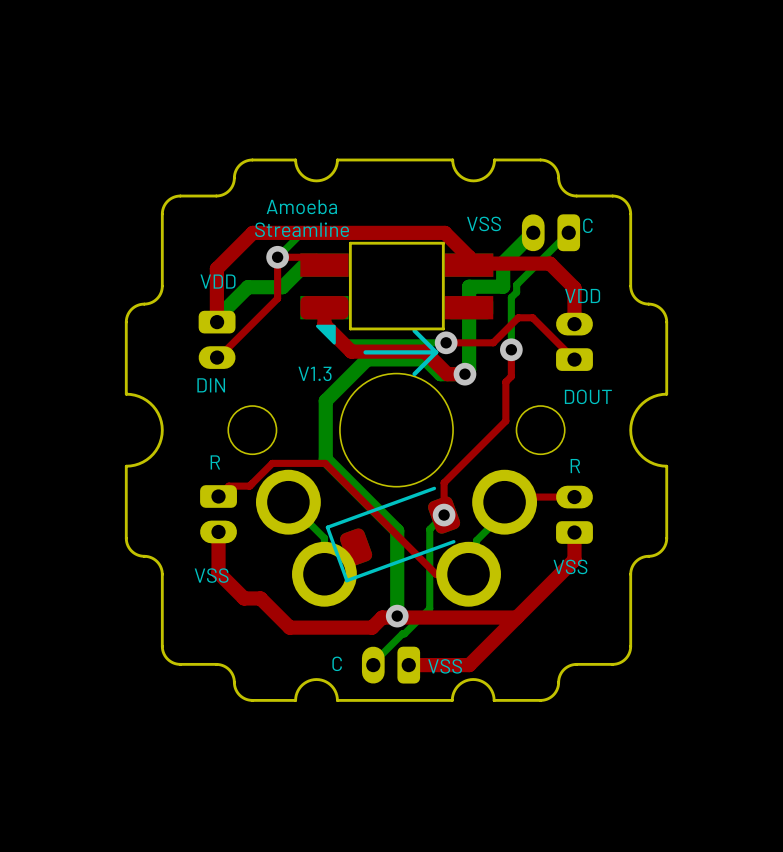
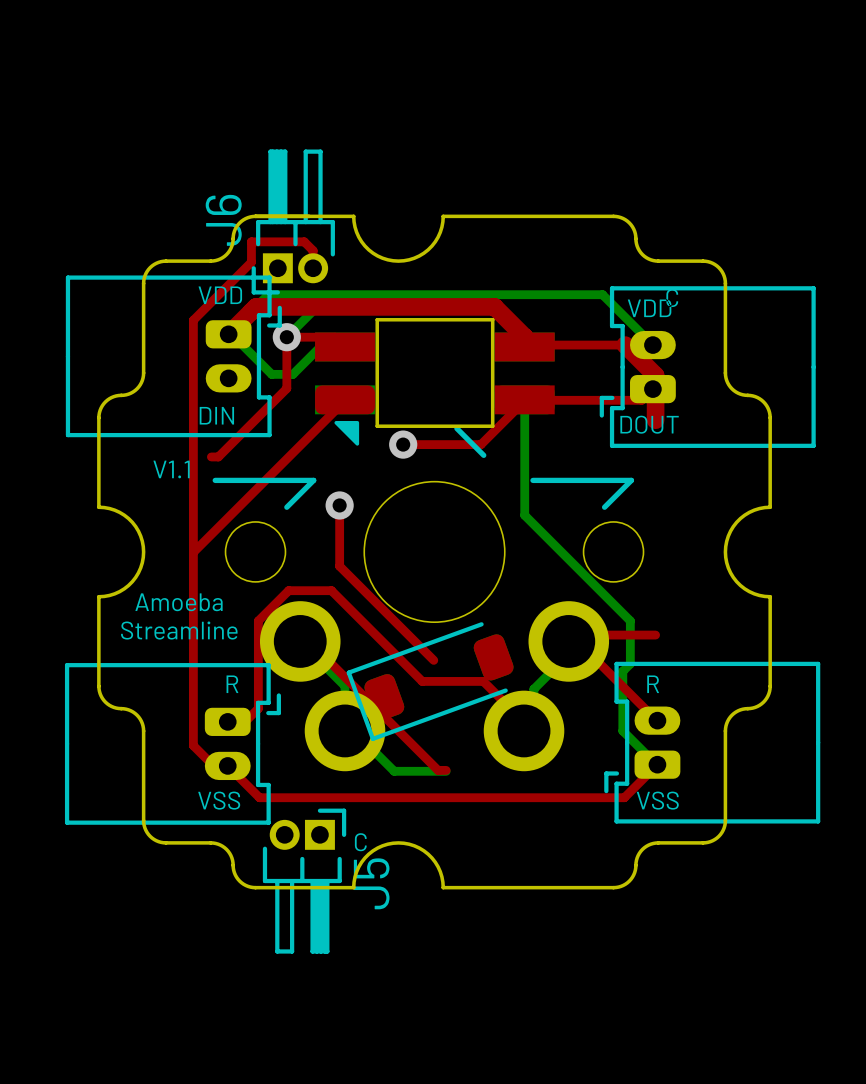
board edge: (295, 159) (297, 167) (301, 174) (308, 179) (316, 180) (324, 179) (331, 174) (335, 167) (337, 159) -> none
board edge: (337, 160) (452, 159) (454, 167) (458, 174) (465, 179) (473, 180) (481, 179) (488, 174) (492, 167) (494, 159) (540, 159) -> (255, 216) (353, 216) (358, 237) (368, 249) (382, 258) (398, 261) (414, 258) (428, 249) (440, 232) (443, 216) (613, 216)
J6: none -> (293, 222)
top track: none -> (313, 268) (313, 250) (304, 241) (251, 241) (251, 262) (193, 320) (193, 745) (213, 765) (227, 765) (259, 797) (624, 797) (657, 764)
text position: Amoeba (301, 206) -> Amoeba (178, 602)
text: VSS (484, 223) -> none
text position: Streamline (302, 229) -> Streamline (179, 630)
bottom track: (533, 232) (503, 262) (503, 286) (469, 286) (469, 307) -> none
part: (550, 232) -> none
bottom track: (568, 232) (516, 284) (516, 292) (511, 297) (511, 349) -> none
top track: (230, 254) (216, 268) (216, 318) -> none
top track width: thick (471, 263) (549, 263) -> thin (527, 345) (625, 345)
bottom track width: thick (304, 265) (282, 287) (265, 287) -> thin (320, 346) (292, 374) (271, 374)
part: none -> (173, 356)
text position: VDD (218, 281) -> VDD (220, 295)
part: none -> (707, 367)
bottom track: (265, 287) (247, 287) (216, 318) -> (271, 374) (231, 334) (228, 334) (268, 294) (602, 294) (652, 345)
text position: VDD (582, 295) -> VDD (649, 308)
top track: none -> (652, 389) (641, 400) (525, 400) (480, 444) (403, 444)
bottom track: (325, 304) (325, 323) (344, 342) (446, 342) -> none
top track: (324, 307) (324, 324) (351, 351) (424, 351) (447, 374) (464, 374) -> (345, 400) (193, 552)
bottom track width: thick (469, 307) (469, 370) -> thin (524, 399) (524, 477)
part: (217, 339) -> none
part: (574, 341) -> none
top track: (446, 342) (493, 342) (518, 317) (532, 317) (574, 359) -> none
via: (446, 342) -> none
via: none -> (403, 444)
top track: (511, 349) (511, 376) (505, 382) (505, 421) (444, 482) (444, 515) -> none
via: (511, 349) -> none
line: (365, 352) (436, 352) (414, 373) -> none
text: none -> V1.1 (171, 469)
bottom track: (469, 370) (464, 374) (440, 374) (425, 359) (367, 359) (325, 400) (325, 459) (397, 530) (397, 618) -> (524, 477) (524, 515) (630, 620) (630, 663) (622, 671) (622, 730) (657, 764)
line: none -> (215, 480) (313, 480) (286, 507)
line: none -> (532, 480) (631, 480) (604, 507)
text: V1.3 (315, 373) -> none
via: (464, 374) -> none
text position: DIN (211, 385) -> DIN (216, 415)
top track: none -> (339, 505) (339, 566) (433, 660)
via: none -> (339, 505)
text position: DOUT (588, 396) -> DOUT (649, 424)
text position: R (215, 462) -> R (232, 684)
text position: R (575, 466) -> R (653, 684)
top track: (218, 496) (228, 486) (249, 486) (272, 463) (325, 463) (436, 574) (468, 574) -> none
top track: none -> (310, 642) (438, 770) (446, 770)
top track: none -> (578, 642) (656, 720)
part: (218, 514) -> none
part: (574, 514) -> none
bottom track: (444, 515) (429, 529) (429, 608) (373, 665) -> none
via: (444, 515) -> none
top track: (218, 531) (218, 572) (244, 598) (260, 598) (289, 627) (372, 627) (382, 617) (516, 617) -> none
top track: (574, 532) (574, 559) (469, 665) (408, 665) -> none
top track: none -> (227, 721) (245, 721) (258, 708) (258, 620) (288, 590) (331, 590) (422, 681) (483, 681) (533, 731)
text position: VSS (570, 566) -> VSS (657, 800)
text position: VSS (211, 575) -> VSS (219, 800)
bottom track: none -> (354, 731) (394, 771) (446, 771)
part: none -> (712, 742)
part: none -> (172, 743)
via: (397, 616) -> none
part: (391, 665) -> none
text: VSS (445, 666) -> none
J5: none -> (304, 881)
board edge: (252, 700) (295, 700) (296, 693) (302, 684) (316, 679) (326, 681) (332, 686) (337, 700) (452, 700) (453, 692) (459, 684) (473, 679) (480, 680) (488, 686) (494, 700) -> (255, 887) (353, 887) (356, 871) (368, 854) (382, 845) (398, 842) (414, 845) (428, 854) (440, 871) (443, 887) (555, 887)

